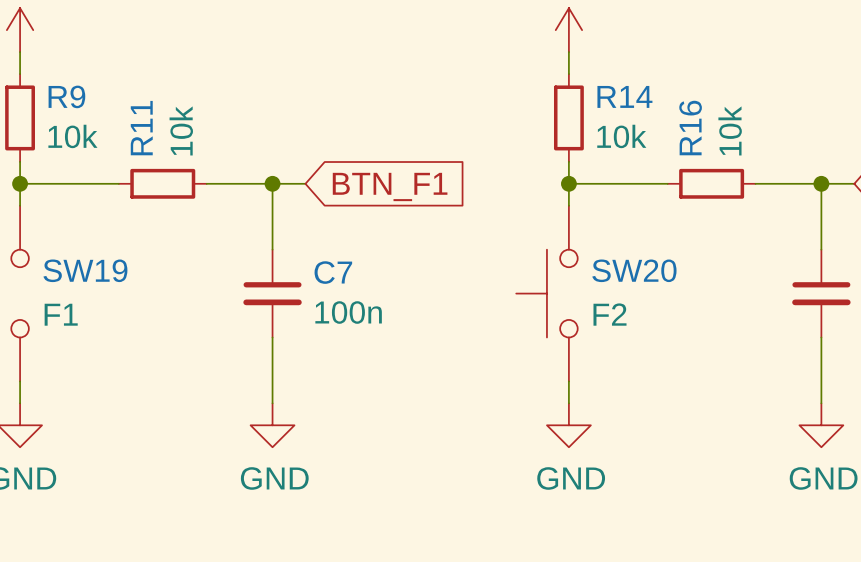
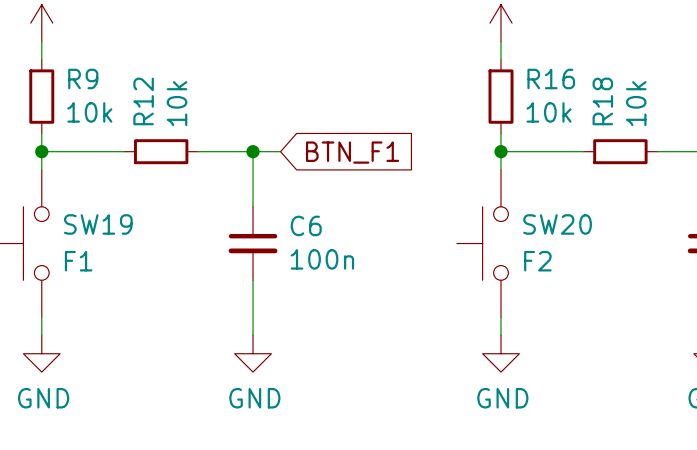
R14 name: R14 (624, 96) -> R16 (551, 78)
R11 name: R11 (141, 128) -> R12 (143, 101)
R16 name: R16 (690, 128) -> R18 (602, 101)
C7 name: C7 (333, 272) -> C6 (306, 225)

